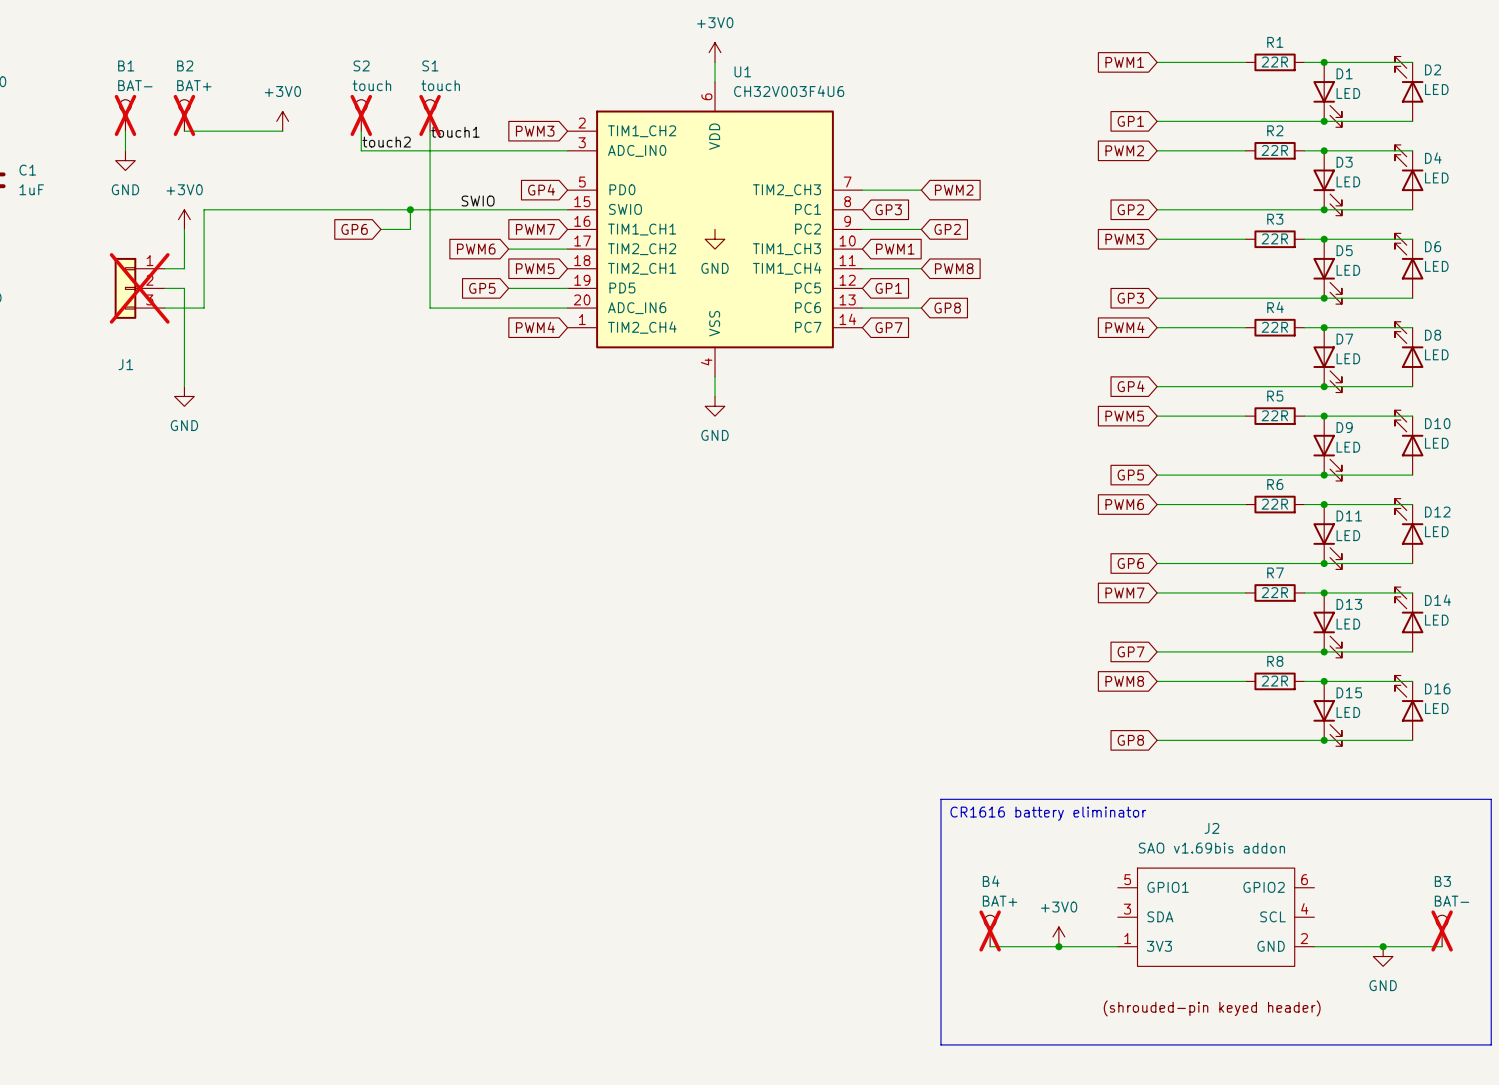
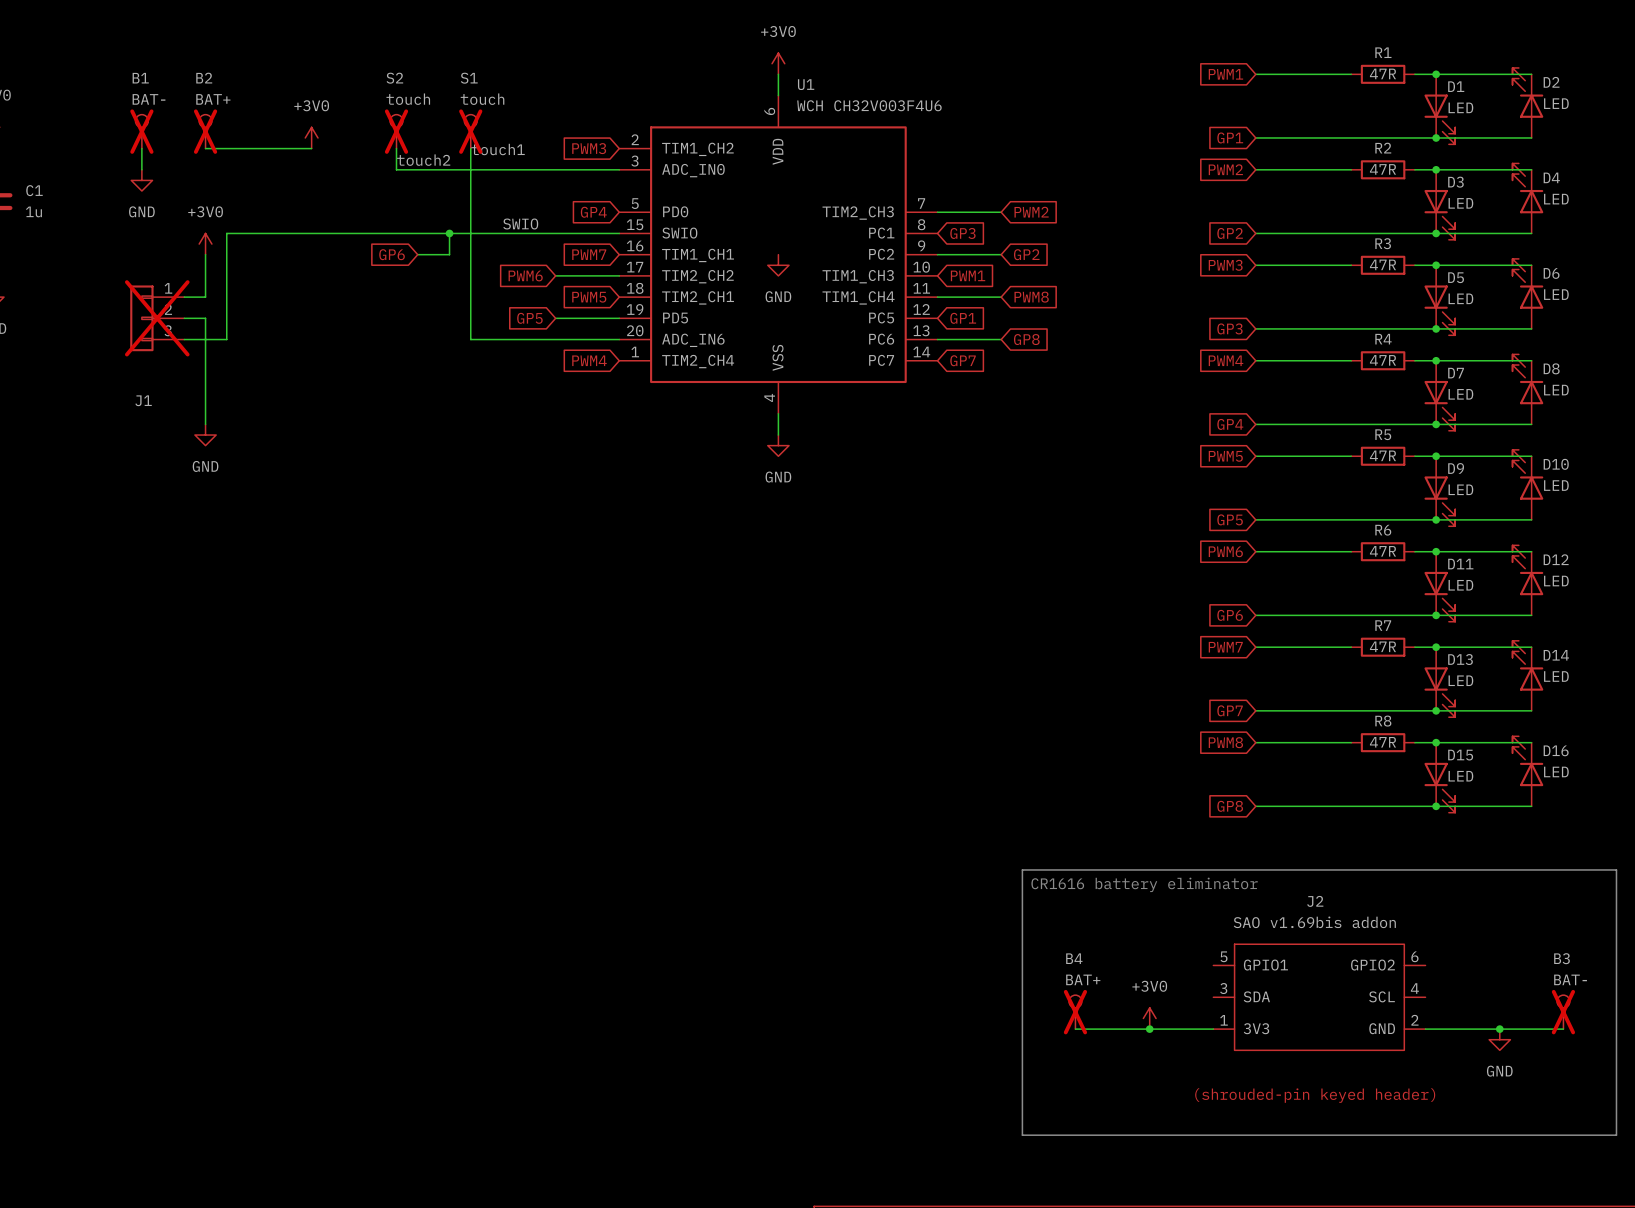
R1 value: 22R (1274, 62) -> 47R (1382, 73)
U1 value: CH32V003F4U6 (789, 91) -> WCH CH32V003F4U6 (869, 105)
R2 value: 22R (1274, 150) -> 47R (1382, 169)
C1 value: 1uF (31, 189) -> 1u (33, 211)
R3 value: 22R (1274, 238) -> 47R (1382, 264)
R4 value: 22R (1274, 327) -> 47R (1382, 360)
R5 value: 22R (1274, 415) -> 47R (1382, 455)
R6 value: 22R (1274, 504) -> 47R (1382, 551)
R7 value: 22R (1274, 592) -> 47R (1382, 646)
R8 value: 22R (1274, 681) -> 47R (1382, 742)

